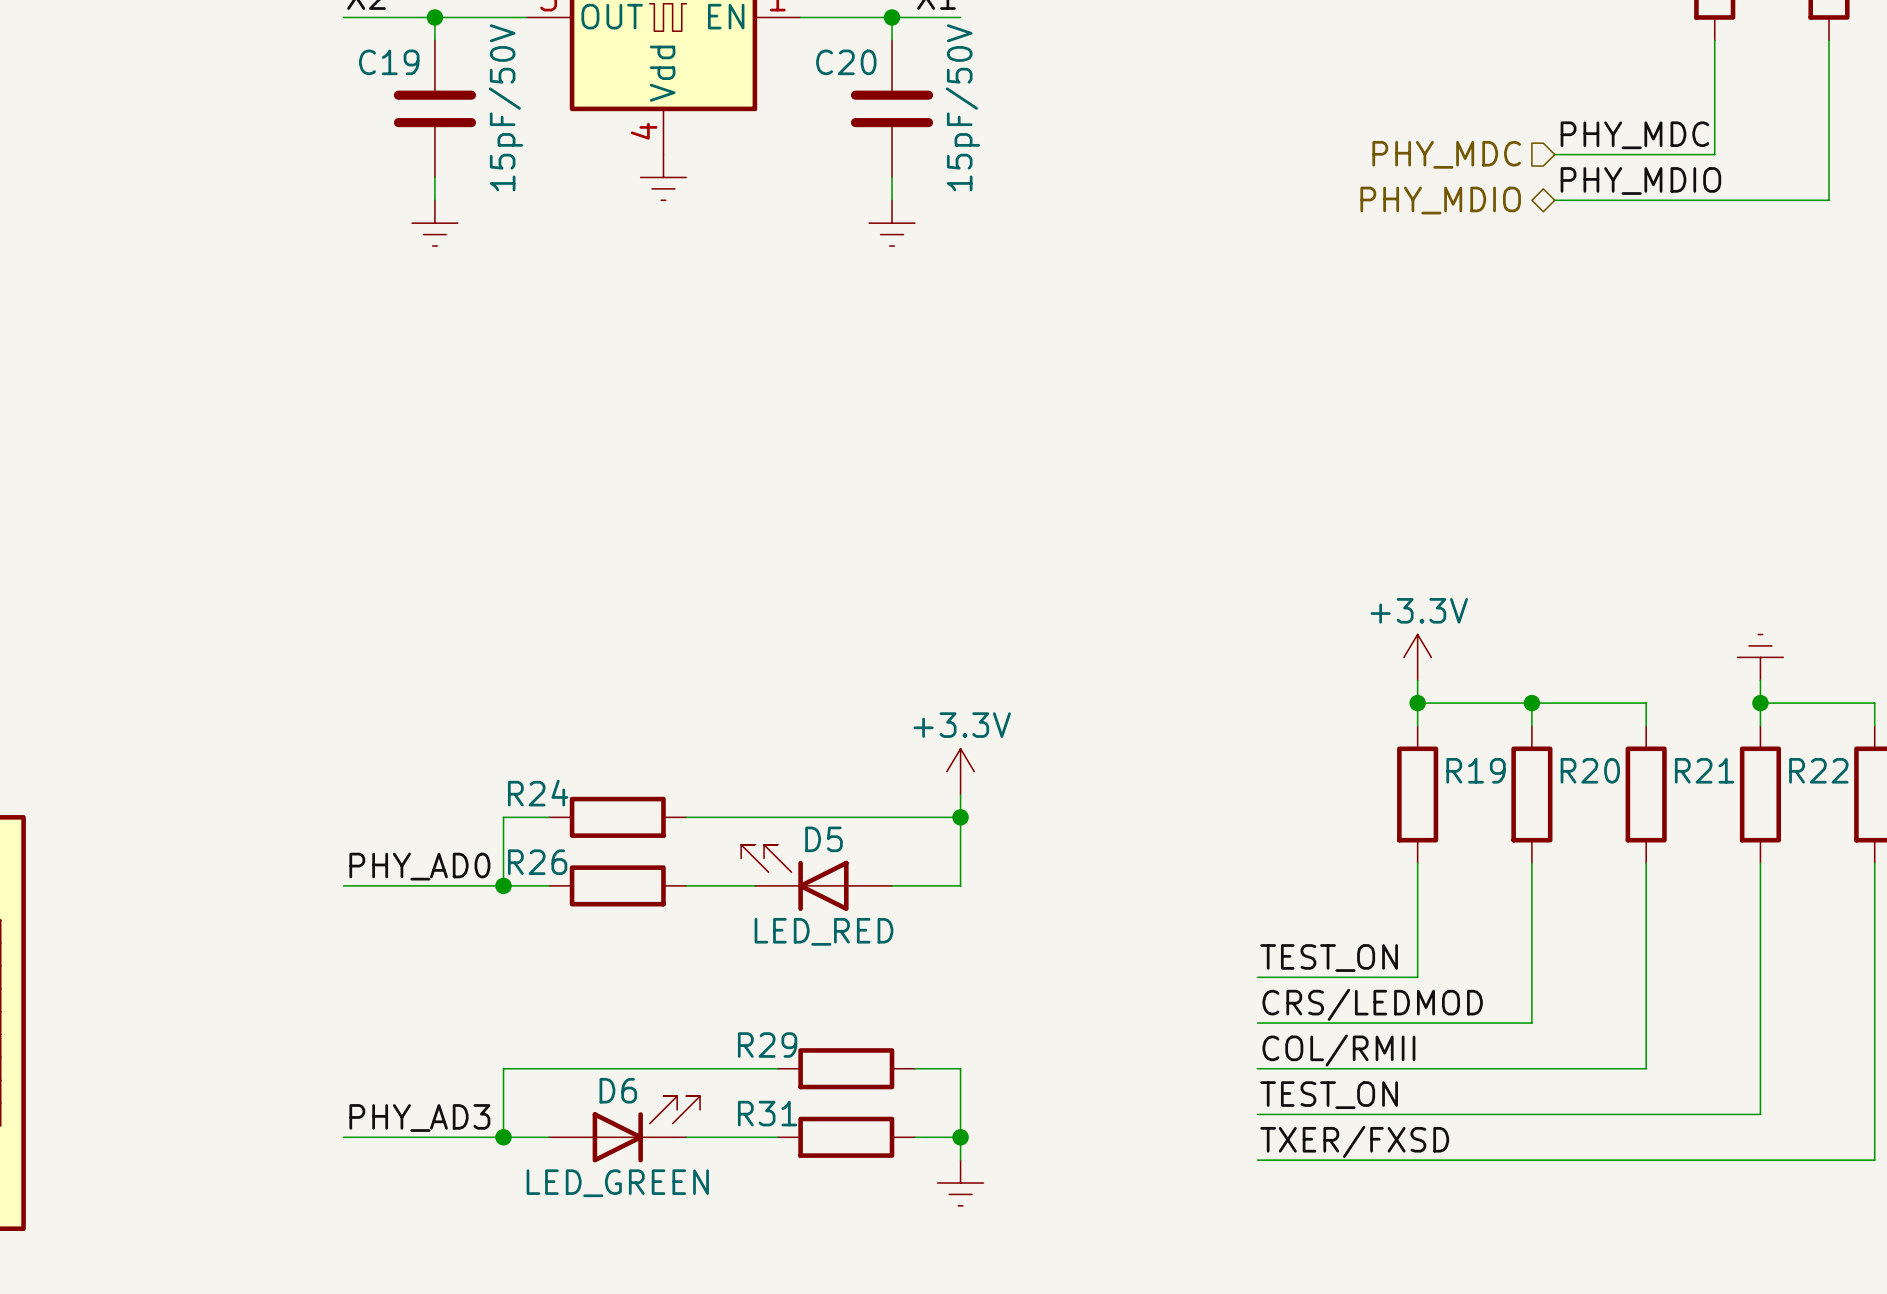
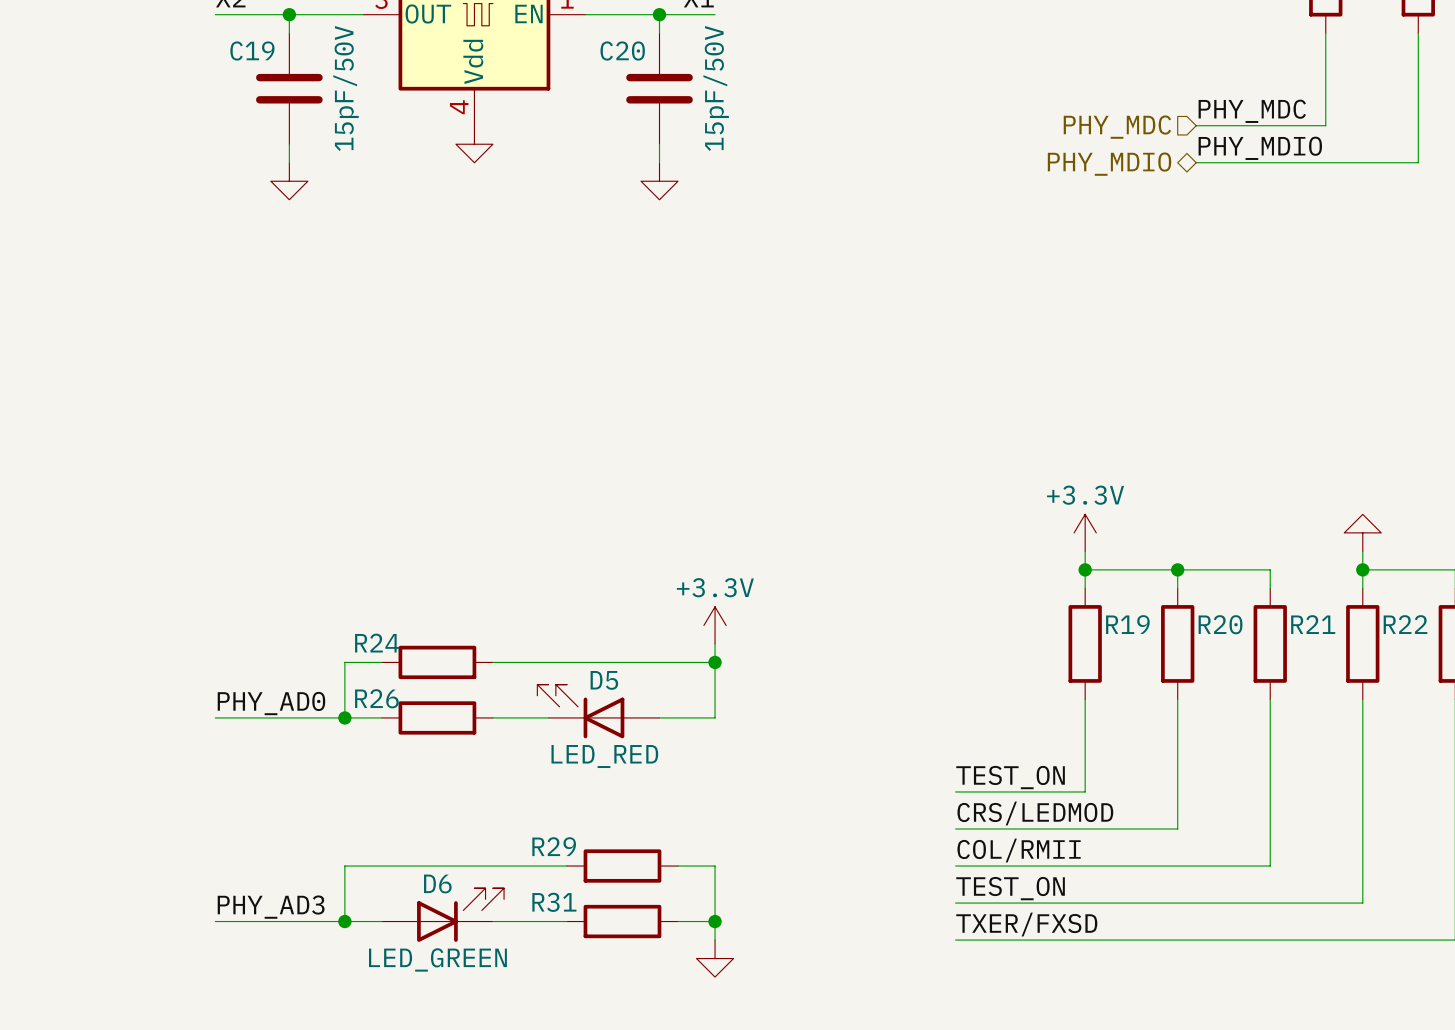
power symbol shape: [640, 154, 687, 201] -> [455, 125, 493, 163]
power symbol shape: [412, 200, 458, 247] -> [270, 162, 308, 200]
power symbol shape: [869, 200, 915, 247] -> [641, 162, 679, 200]
power symbol shape: [1737, 634, 1784, 681] -> [1344, 514, 1382, 552]
power symbol shape: [937, 1160, 984, 1206] -> [696, 940, 734, 978]

